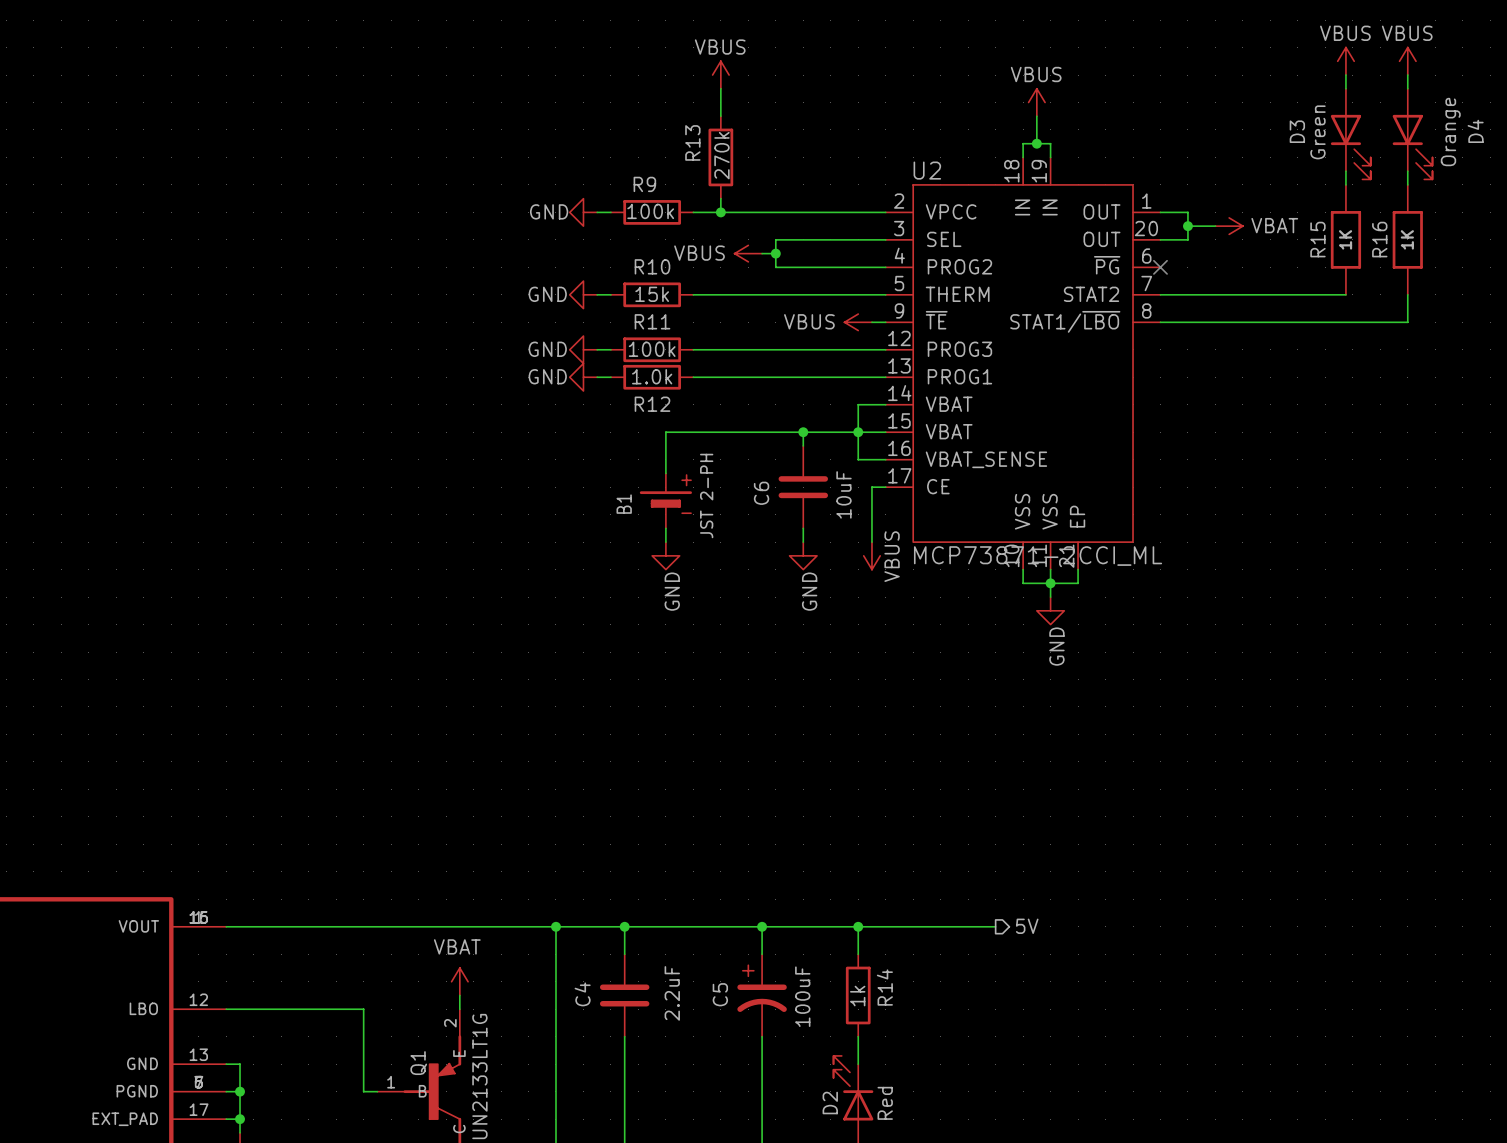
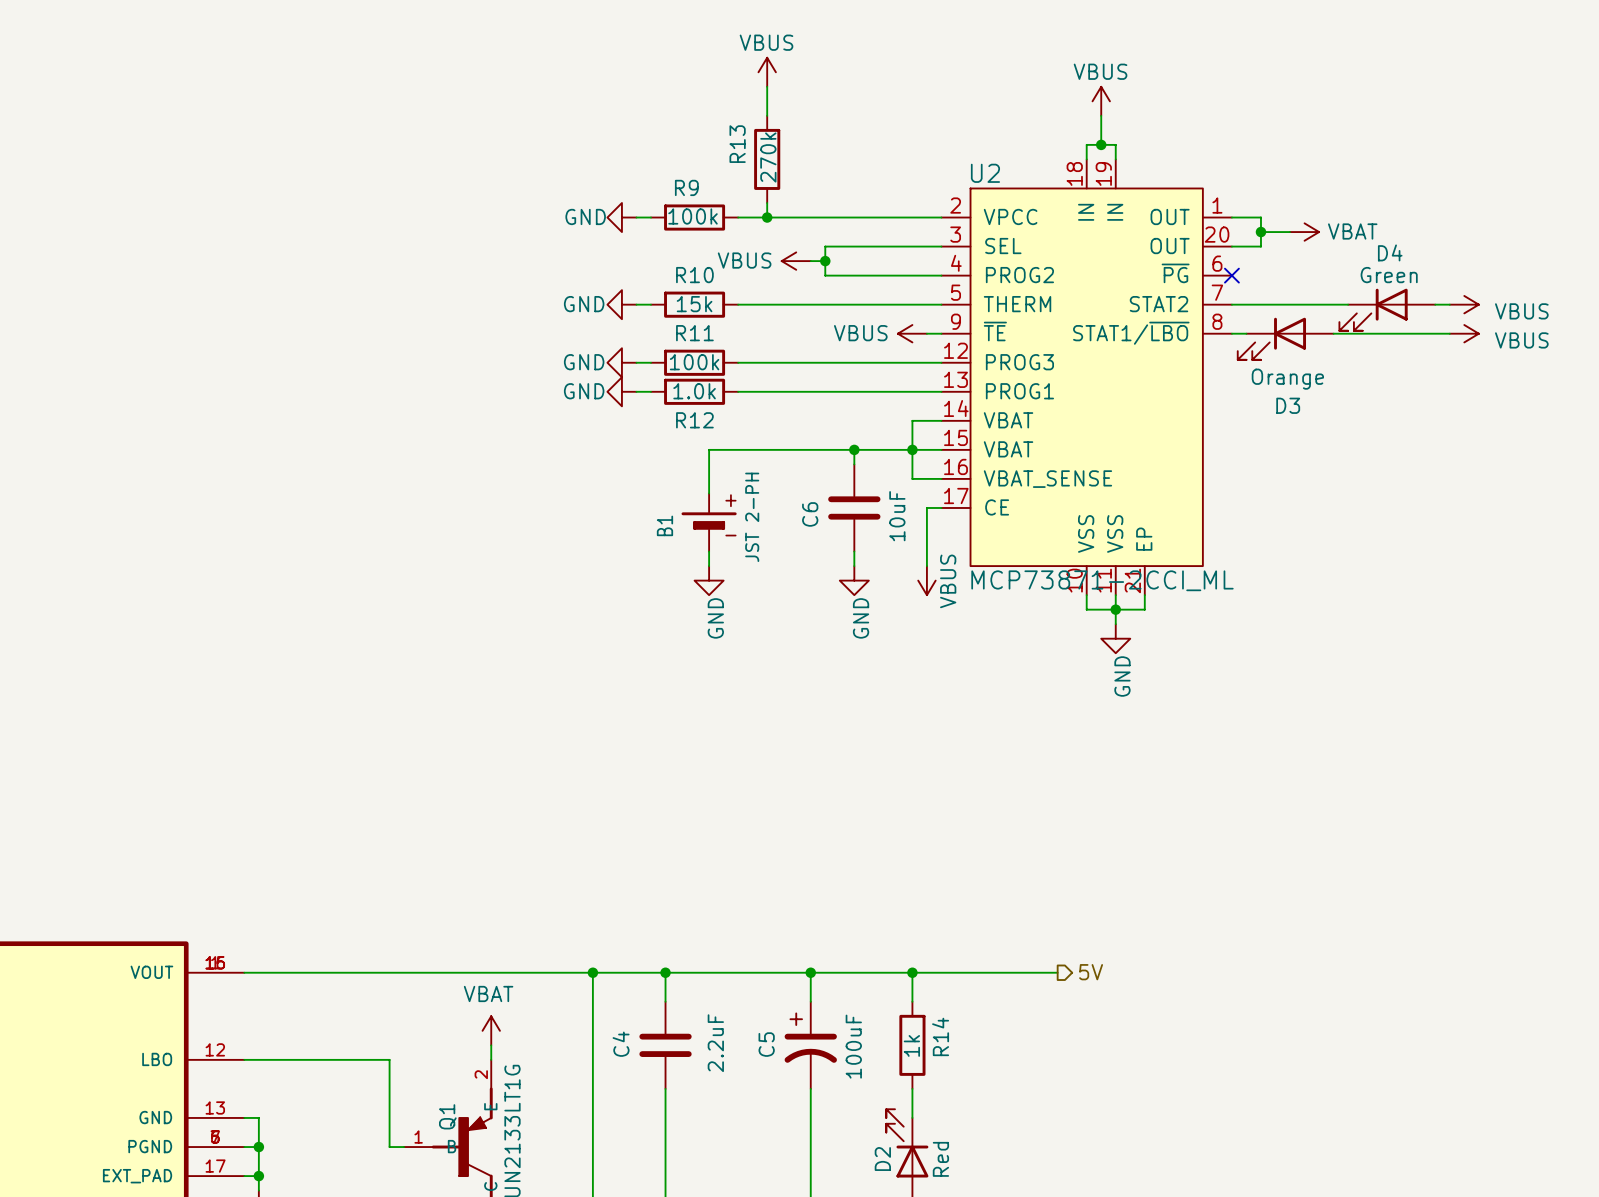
power symbol: VBUS (1345, 61) -> none
power symbol: VBUS (1407, 61) -> none
wire: (1345, 75) (1345, 88) -> none
wire: (1407, 75) (1407, 88) -> none
D3 name position: D3 (1297, 131) -> D3 (1288, 405)
D4 name position: D4 (1475, 131) -> D4 (1390, 252)
D3 value: Green (1317, 132) -> Orange (1287, 379)
D4 value: Orange (1450, 132) -> Green (1389, 275)
D3 position: (1350, 134) -> (1285, 338)
D4 position: (1412, 134) -> (1387, 309)
D3 rotation: 0° (1350, 147) -> 90° clockwise (1271, 338)
D4 rotation: 0° (1412, 147) -> 90° clockwise (1373, 309)
wire: (1345, 171) (1345, 184) -> none
wire: (1407, 171) (1407, 184) -> none
R15: 1K (1345, 239) -> none
R16: 1K (1407, 239) -> none
wire: none -> (1435, 304) (1449, 304)
power symbol: none -> VBUS (1464, 304)
wire: (1407, 294) (1407, 322) (1366, 322) -> none
power symbol: none -> VBUS (1464, 333)

